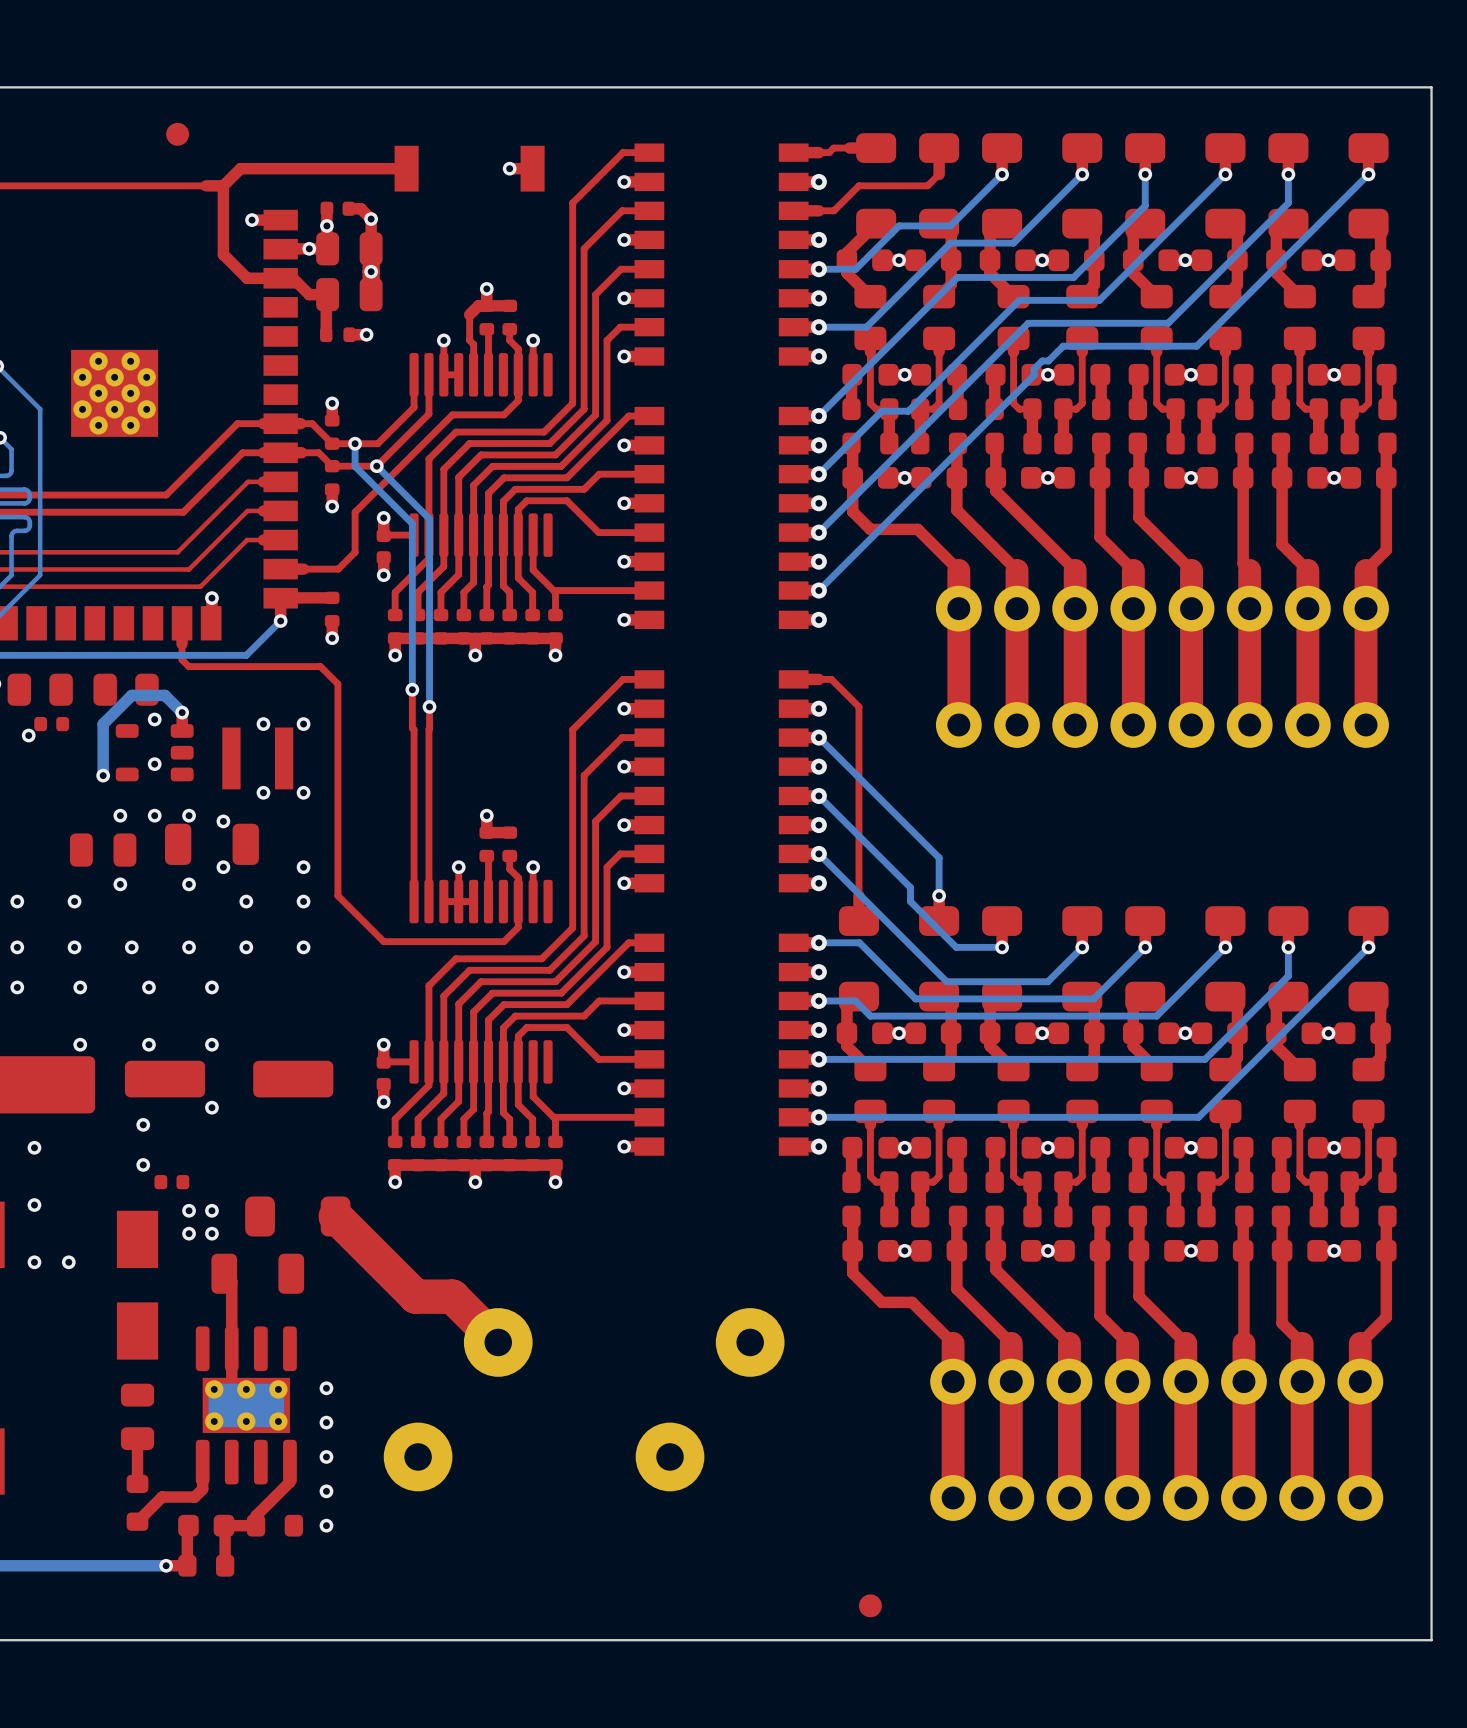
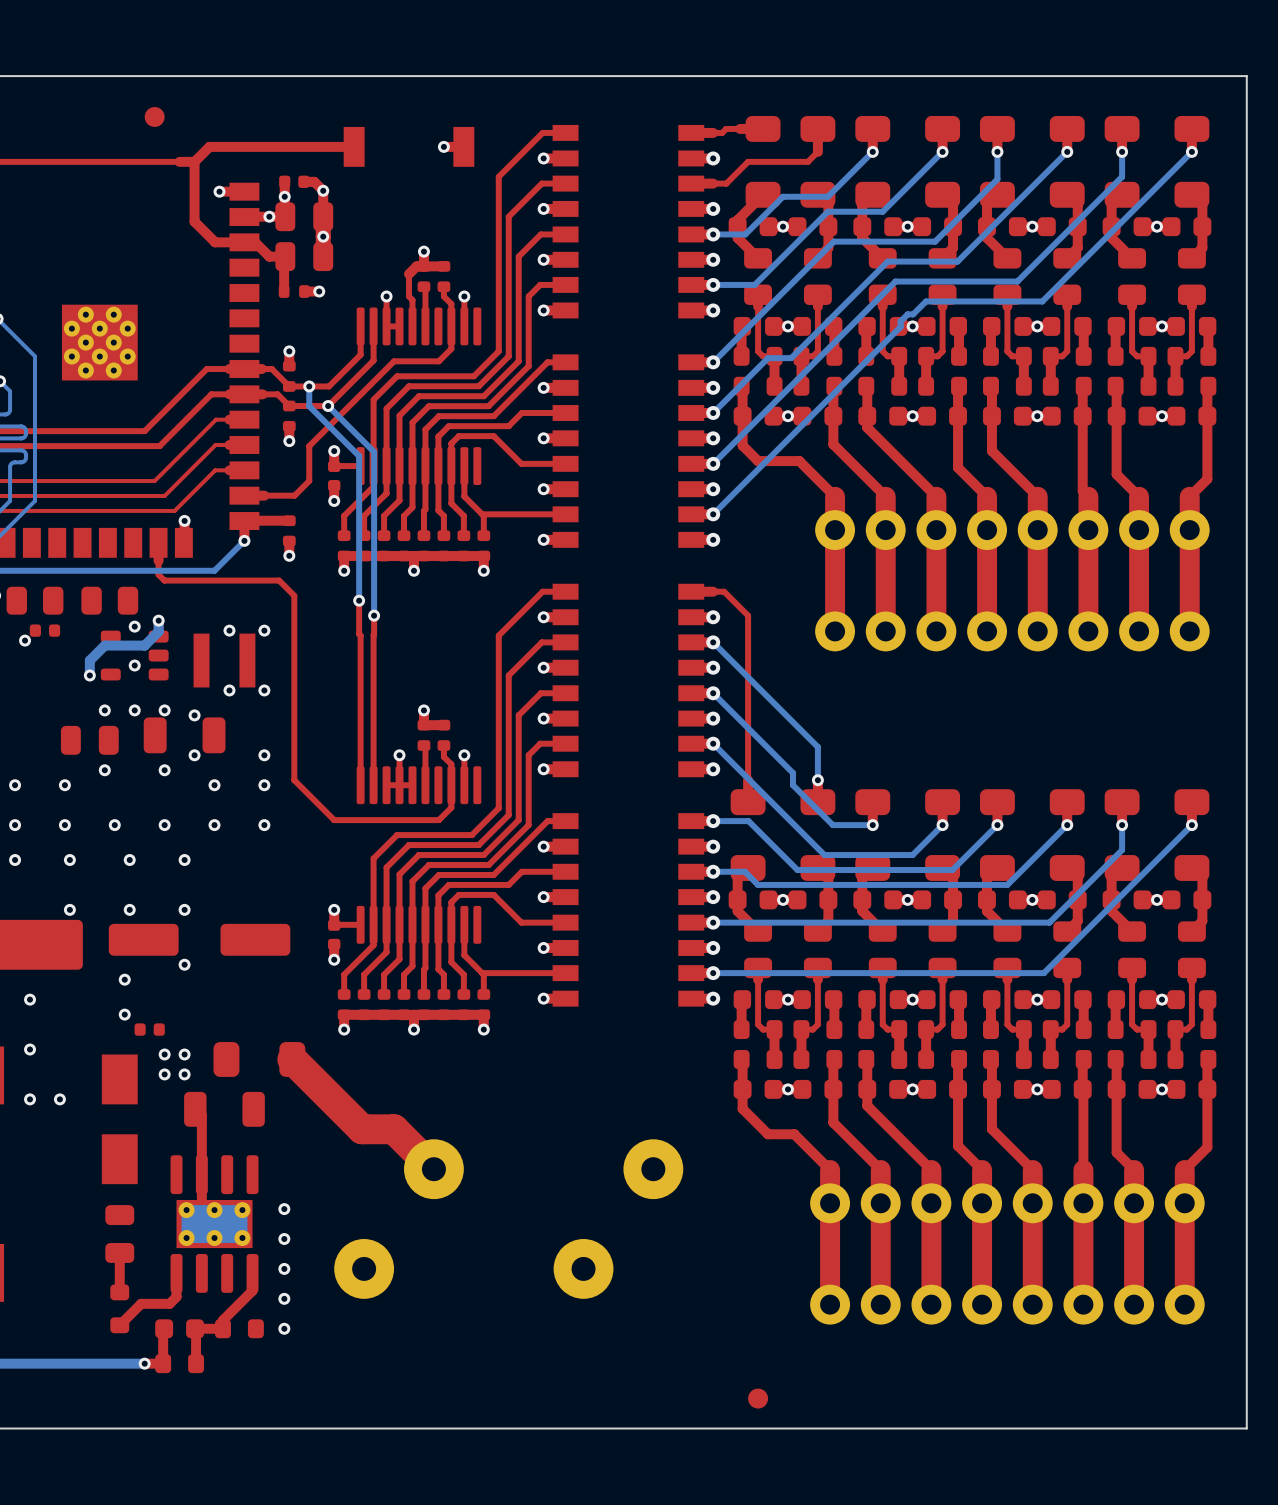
bottom track: (182, 712) (165, 695) (131, 695) (103, 724) (103, 758) -> (158, 620) (158, 631) (144, 645) (104, 645) (89, 660)

